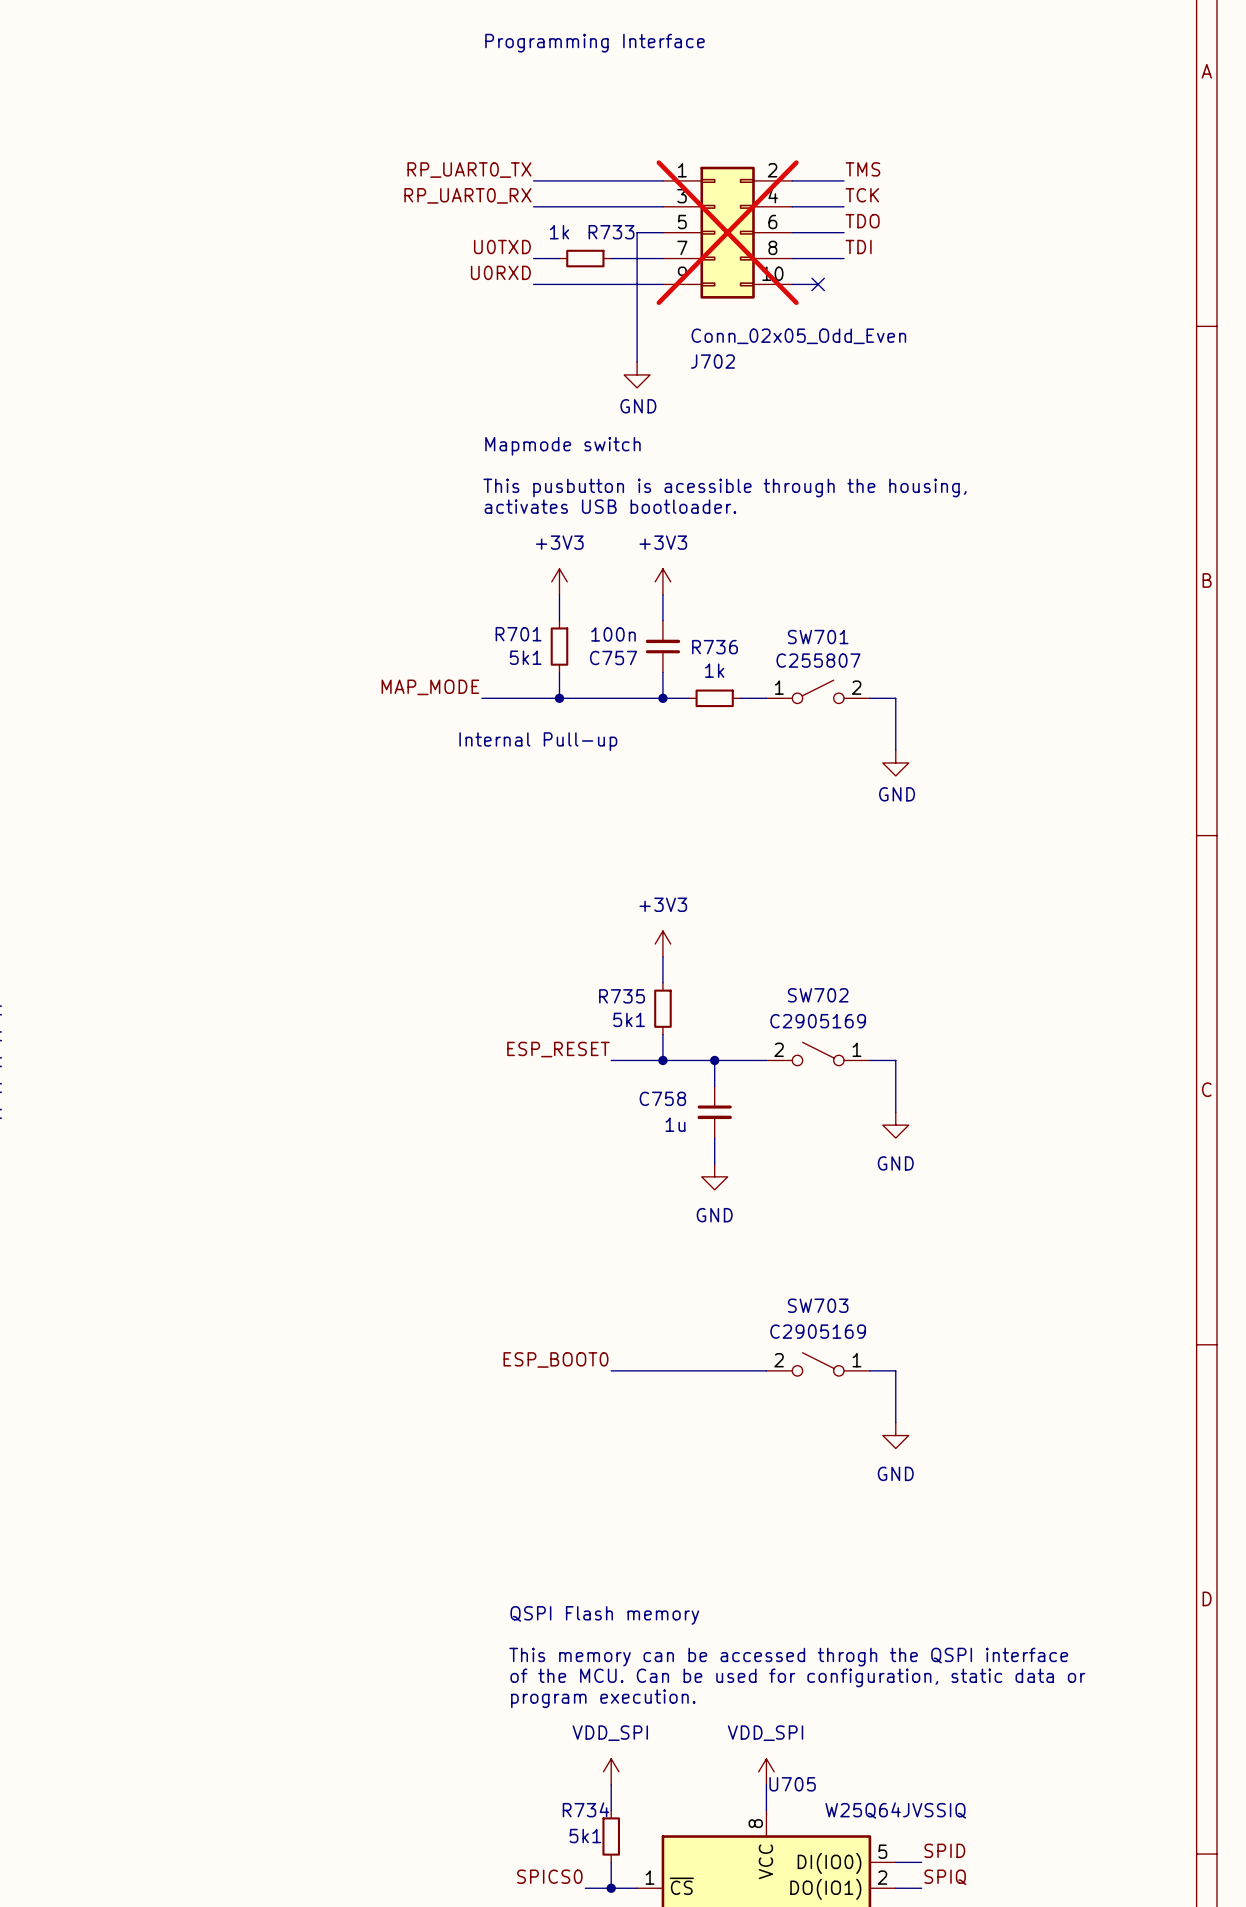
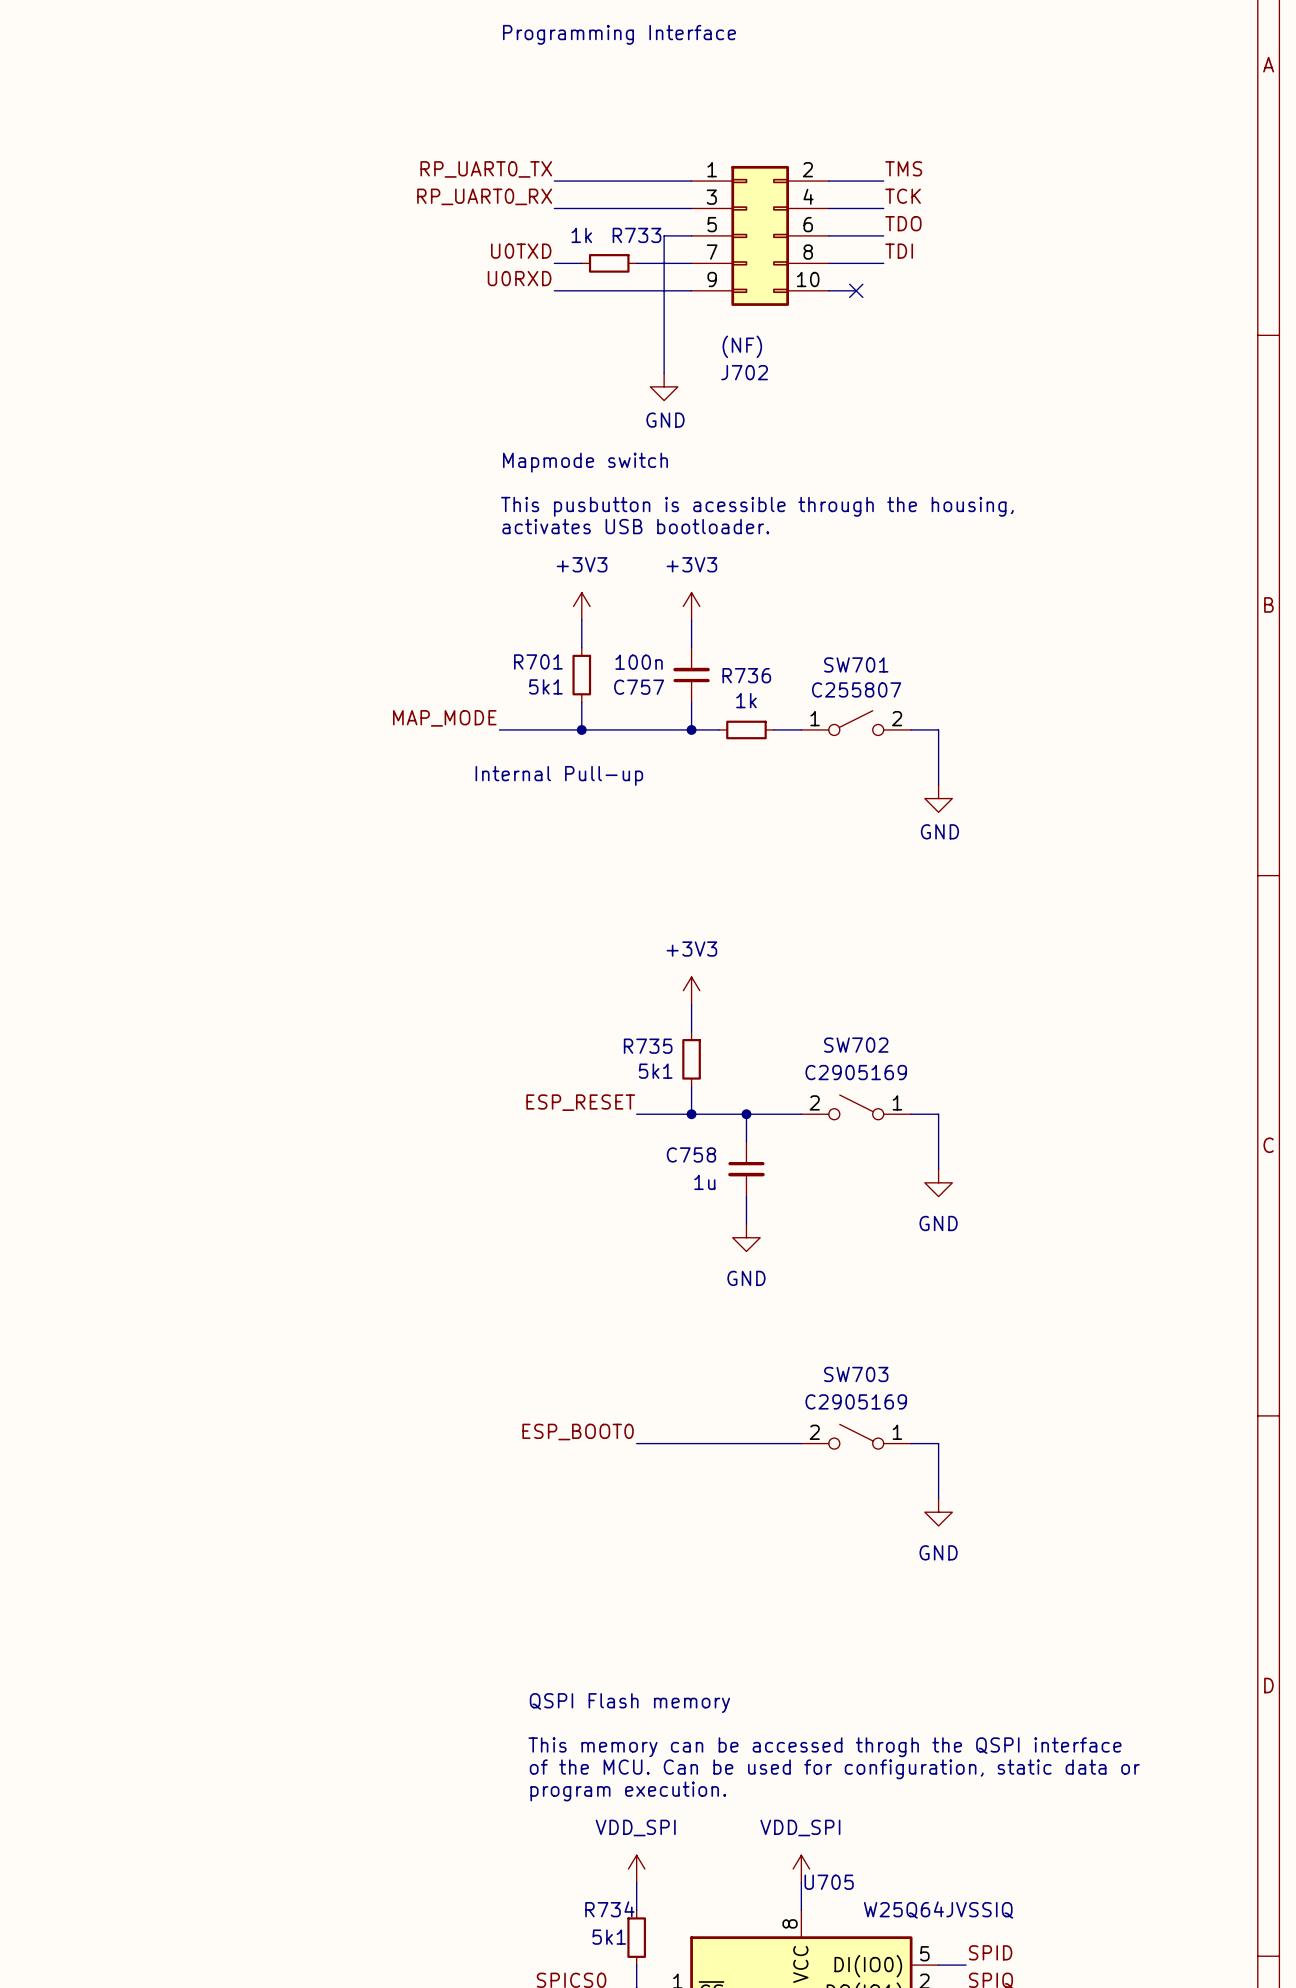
J702 do-not-place cross: (727, 232) -> none
J702 value: Conn_02x05_Odd_Even (798, 336) -> (NF) (742, 346)

